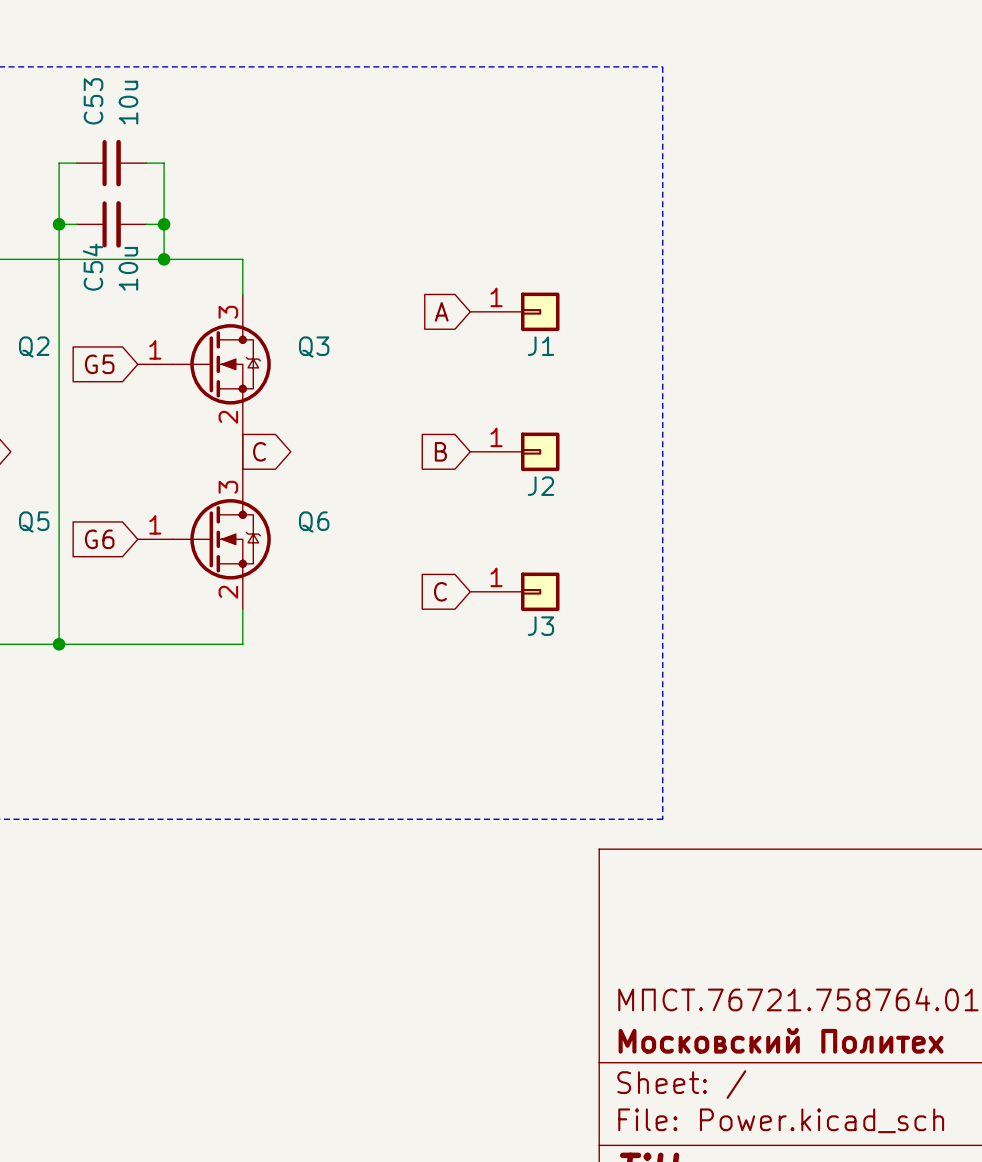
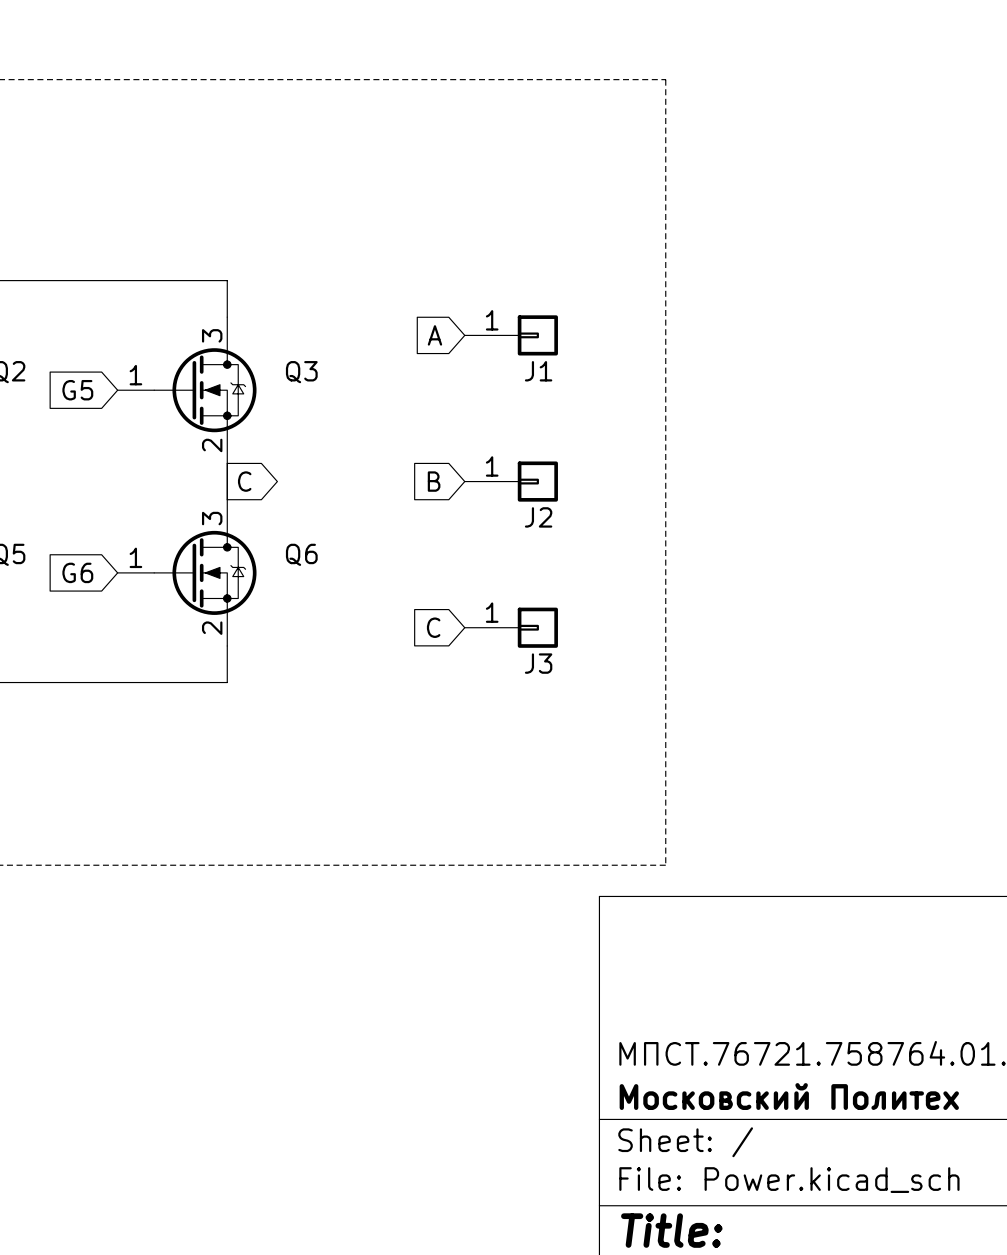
wire: (76, 163) (59, 163) (59, 644) -> none
C53: 10u (111, 163) -> none
wire: (146, 163) (164, 163) (164, 259) -> none
wire: (59, 224) (76, 224) -> none
junction: (59, 224) -> none
C54: 10u (111, 224) -> none
wire: (146, 224) (164, 224) -> none
junction: (164, 224) -> none
junction: (164, 259) -> none
junction: (59, 644) -> none

